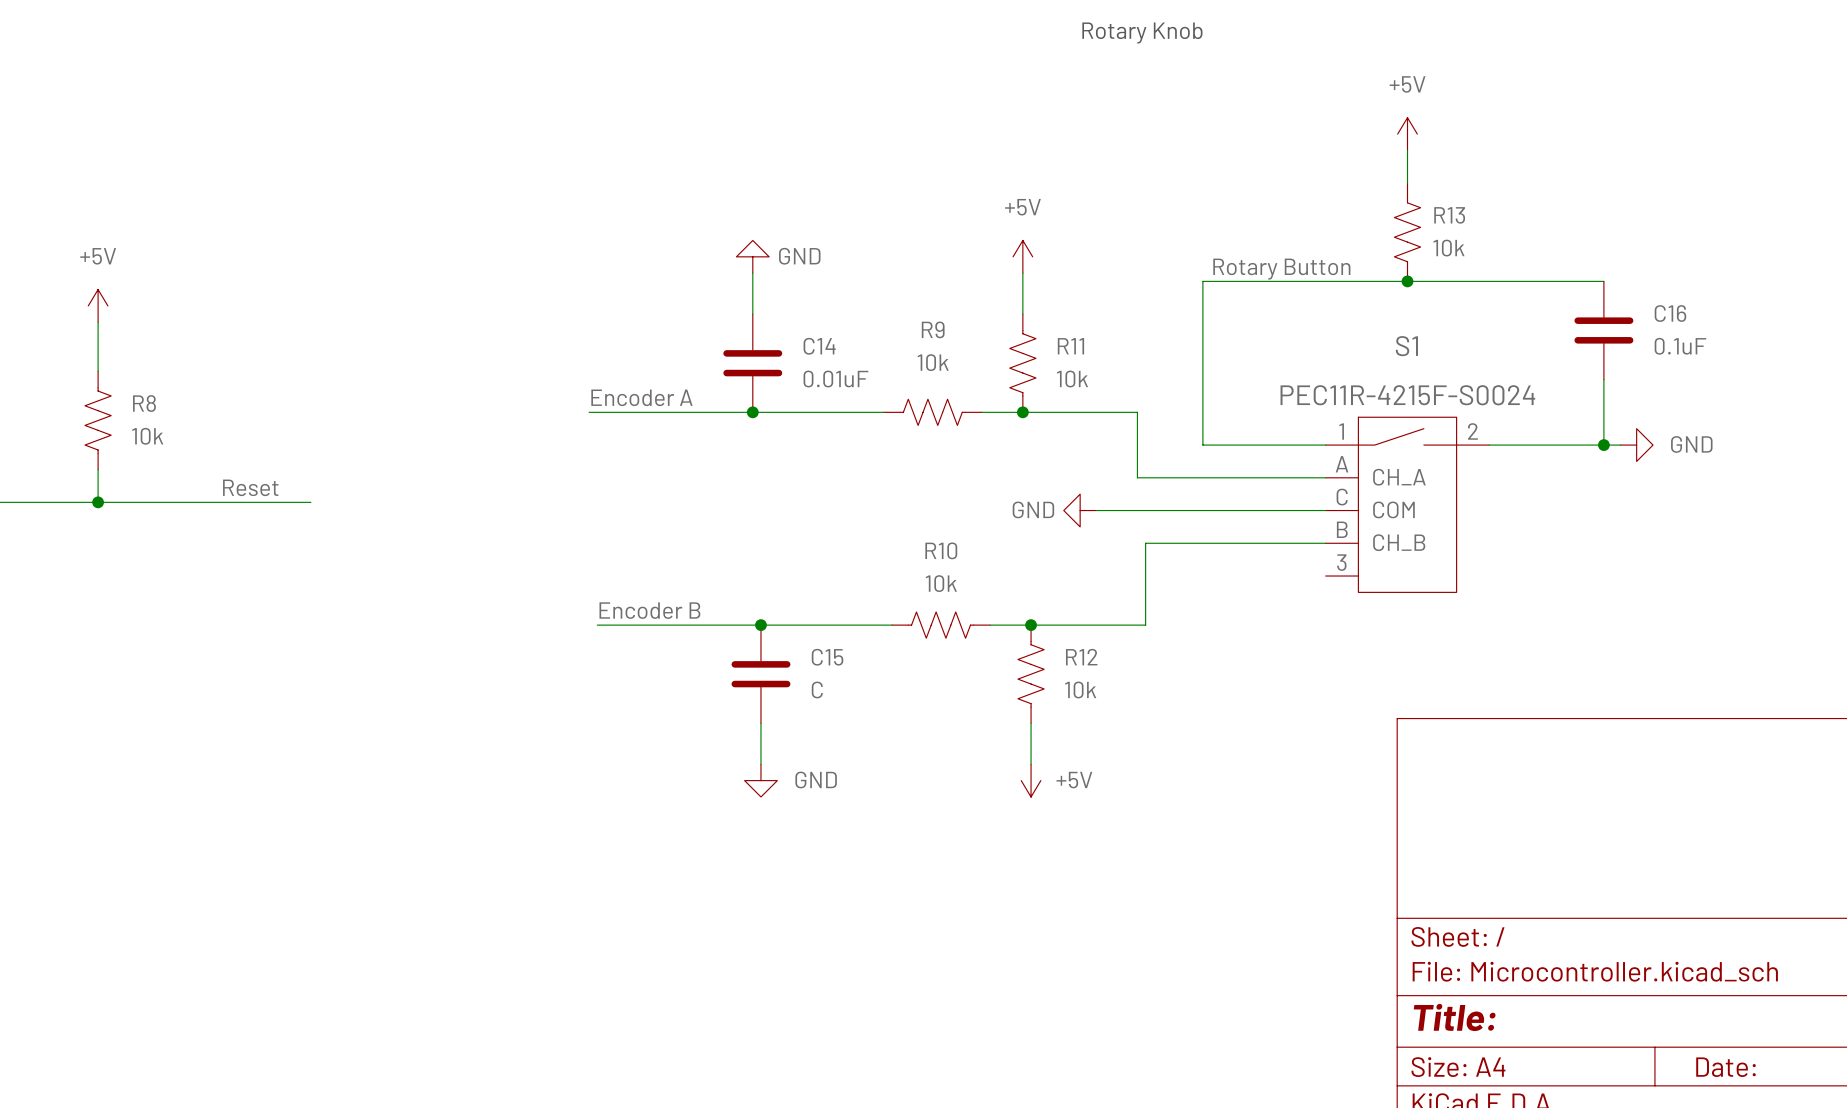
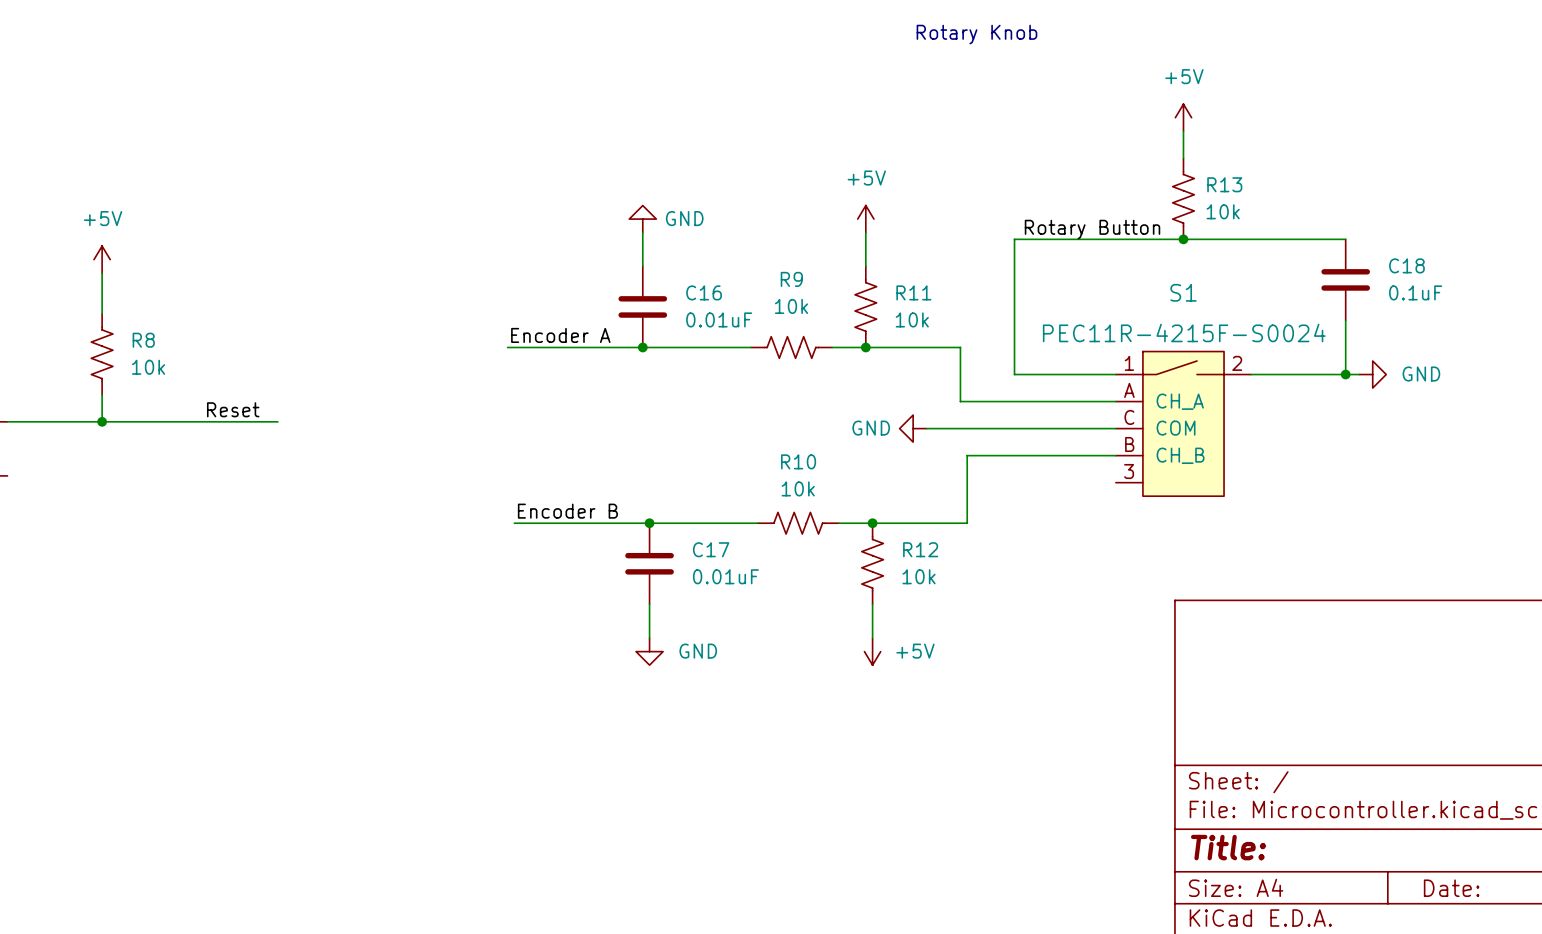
C16 name: C16 (1670, 313) -> C18 (1406, 265)
C14 name: C14 (819, 346) -> C16 (704, 292)
C15 name: C15 (827, 657) -> C17 (711, 549)
C15 value: C (817, 689) -> 0.01uF (725, 576)

